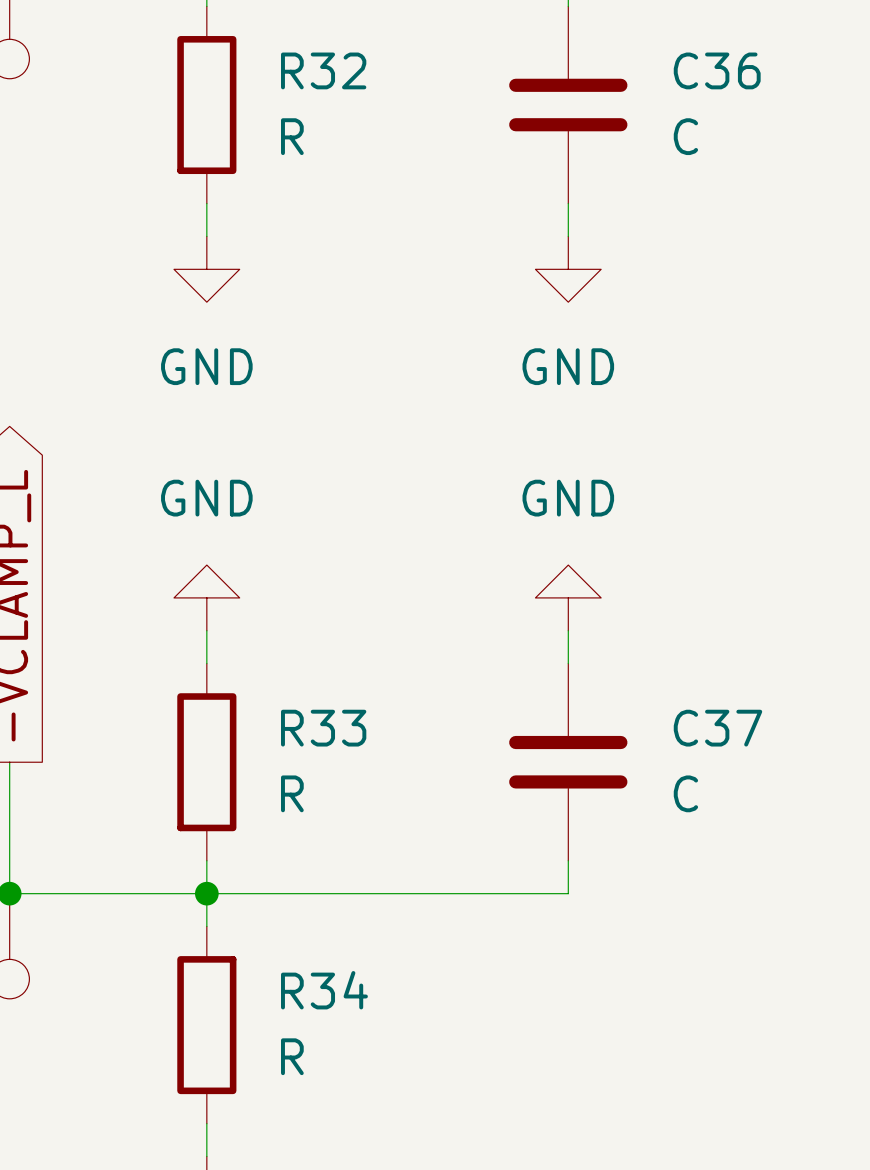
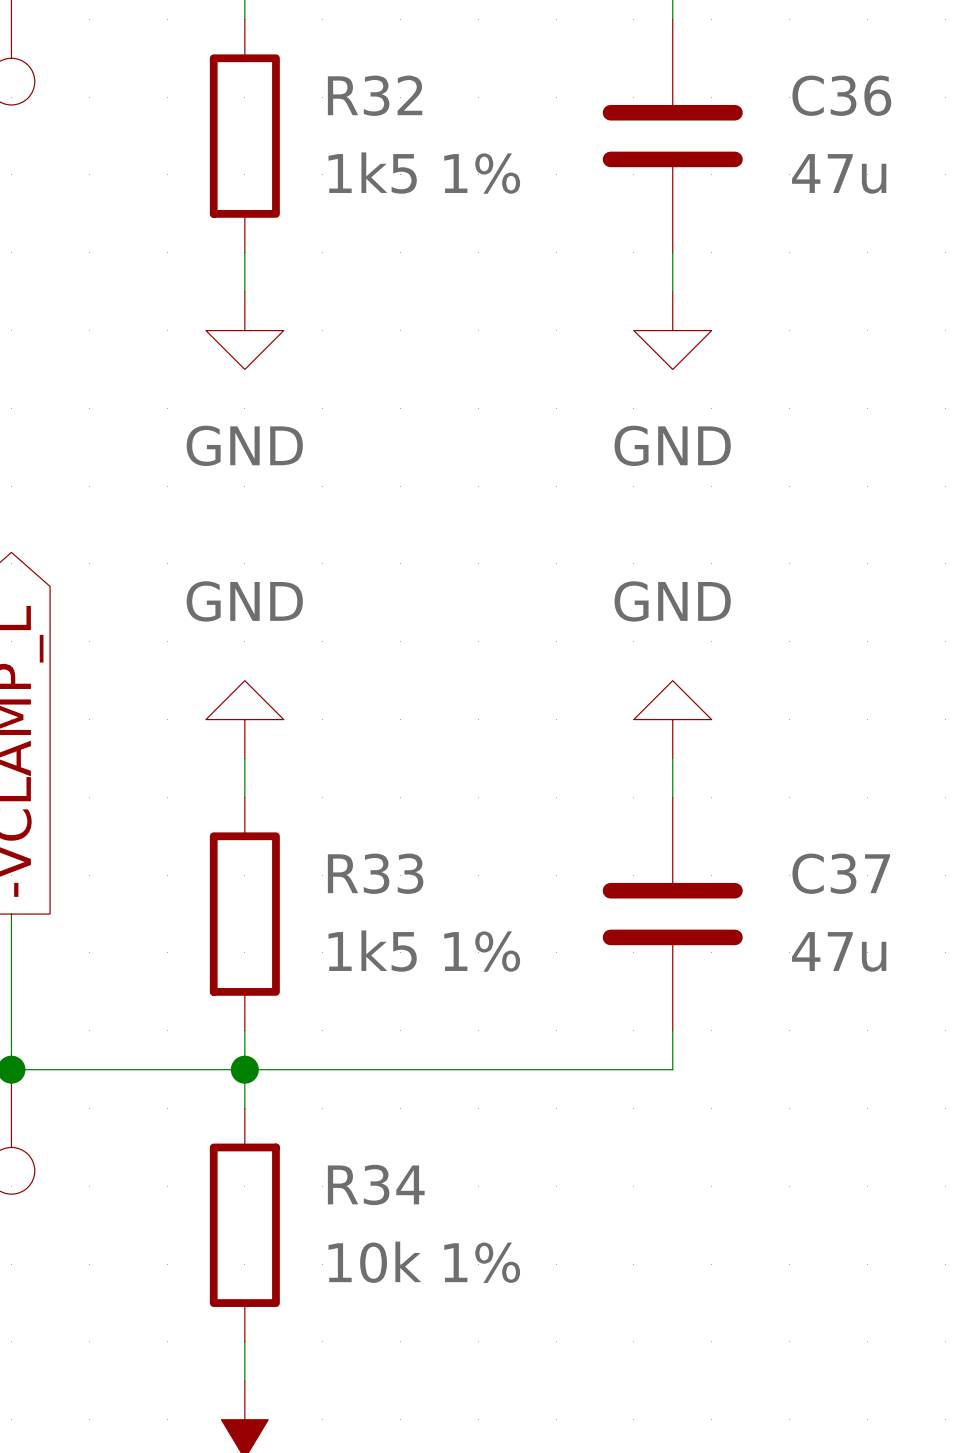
R32 value: R (292, 136) -> 1k5 1% (424, 173)
C36 value: C (685, 136) -> 47u (839, 173)
R33 value: R (292, 793) -> 1k5 1% (424, 951)
C37 value: C (685, 793) -> 47u (839, 951)
R34 value: R (292, 1056) -> 10k 1% (424, 1262)

